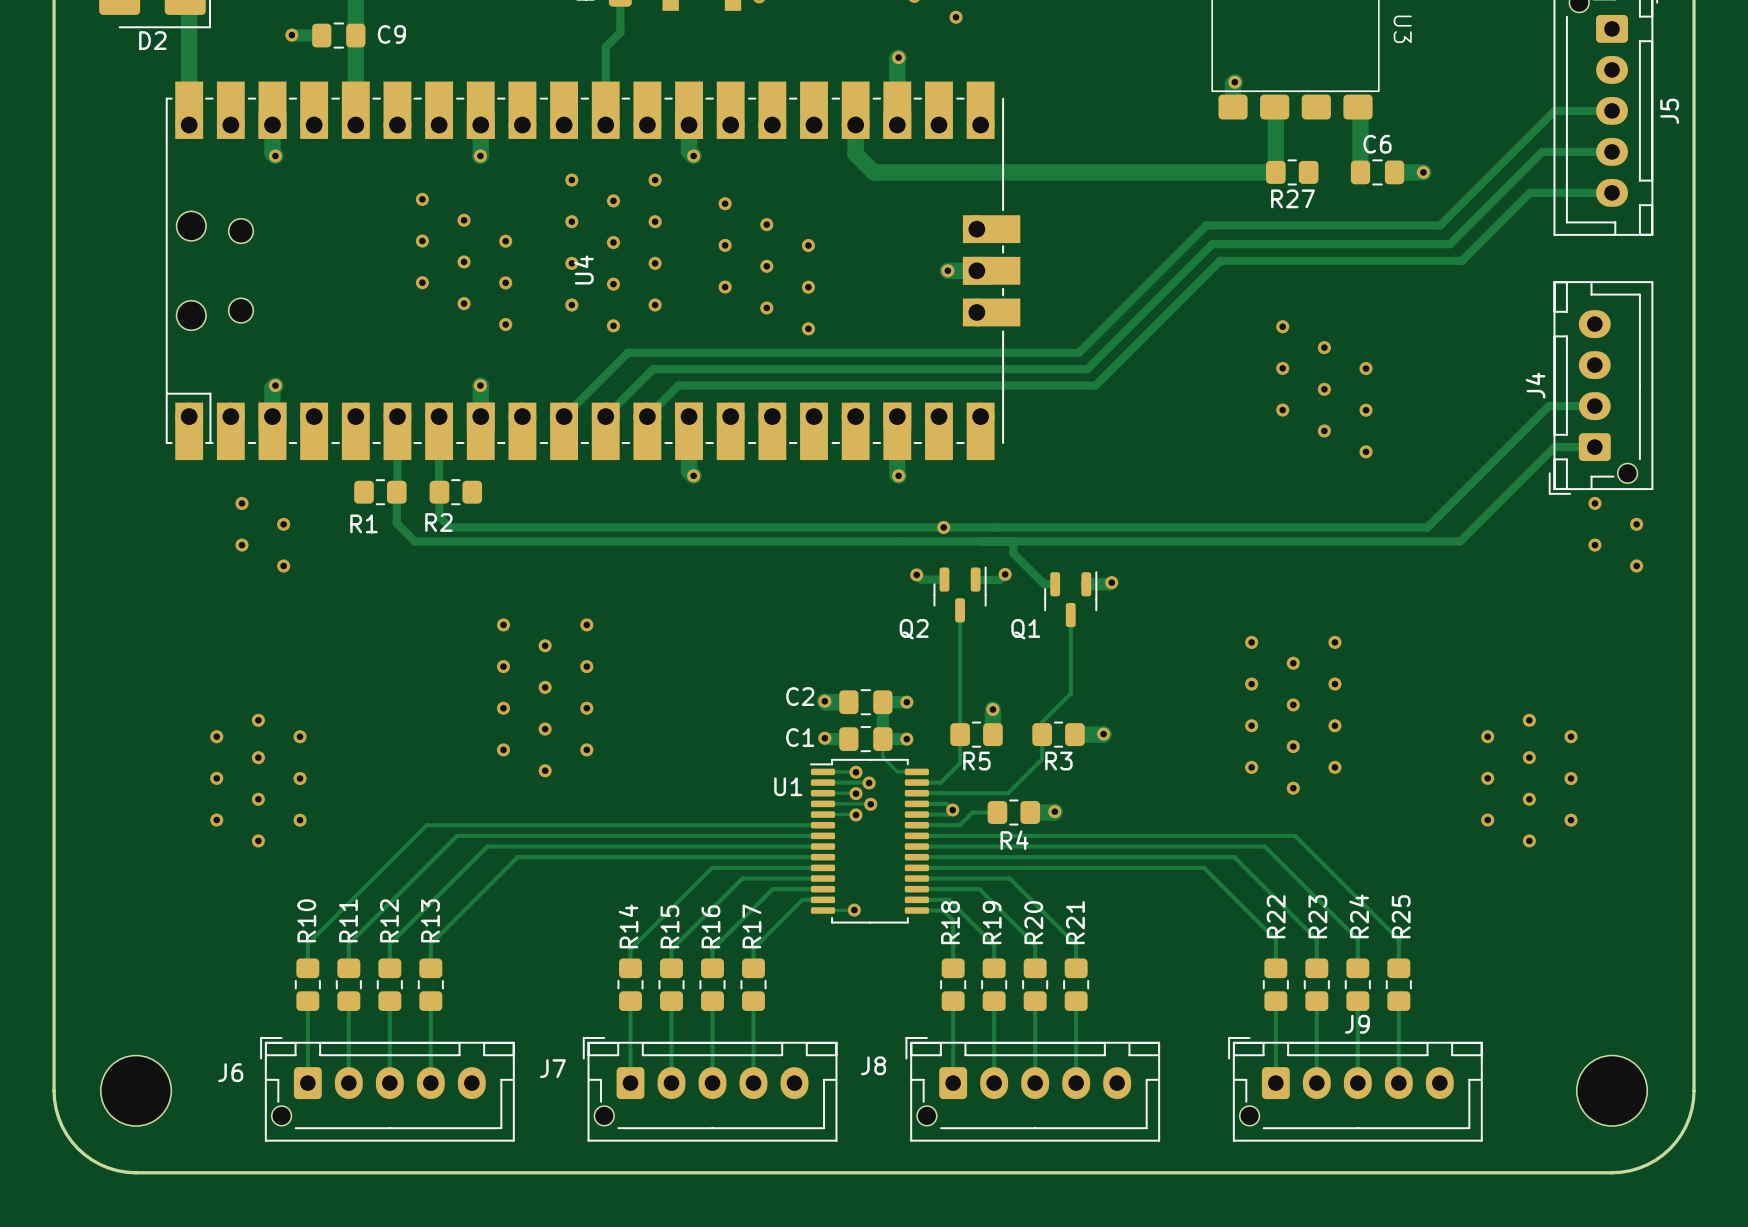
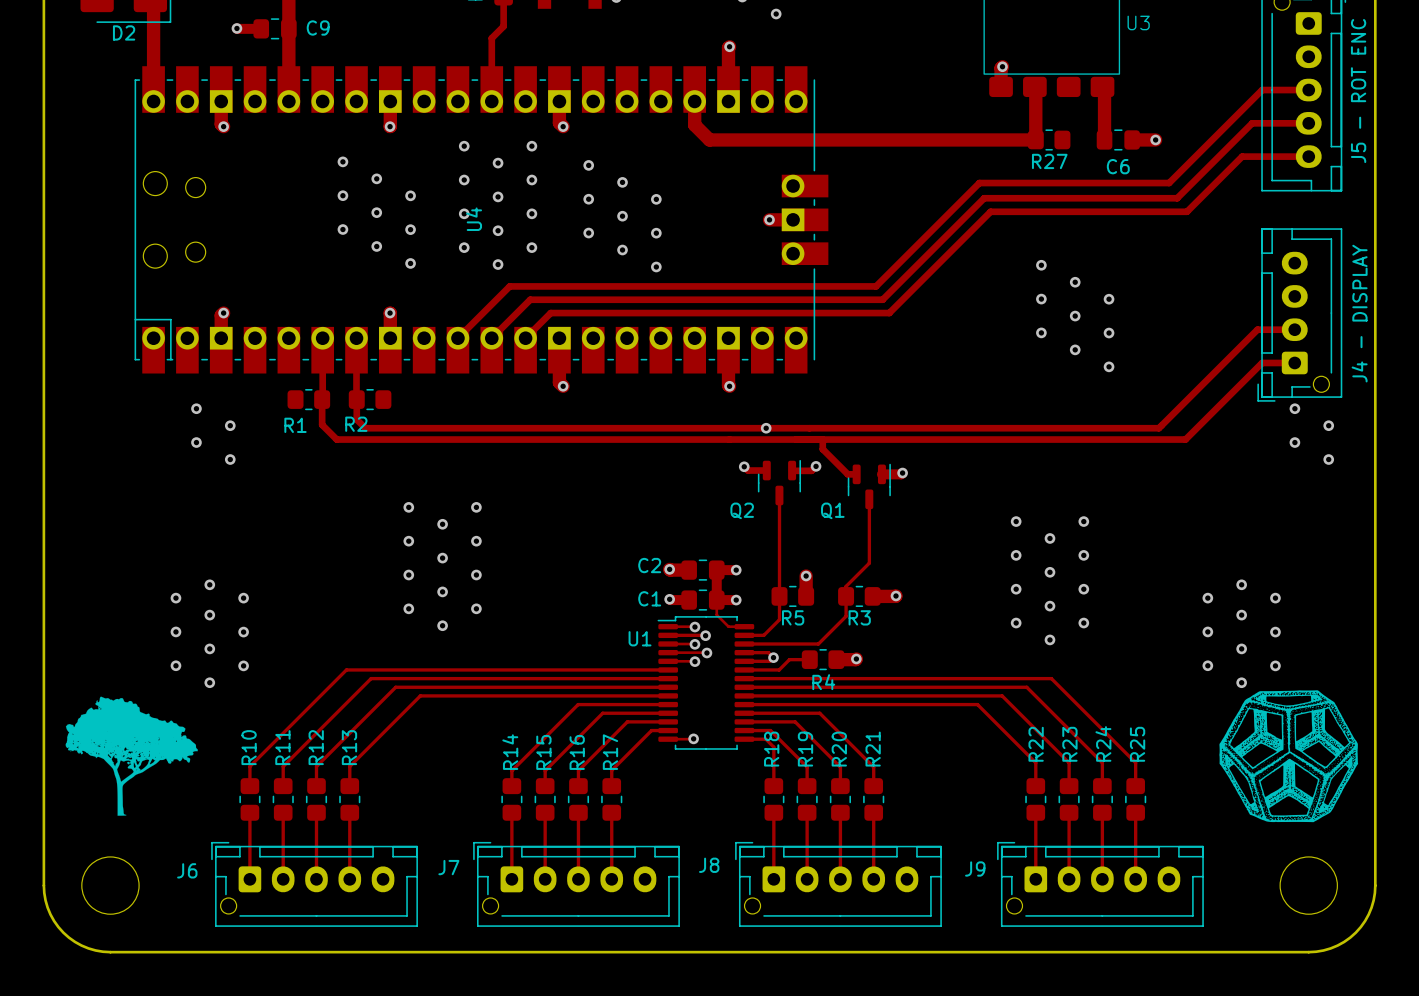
U3 name rotation: 0° (1402, 29) -> 90° counterclockwise (1138, 22)
J5 name: J5 (1669, 111) -> J5 - ROT ENC (1358, 91)
C6 name position: C6 (1377, 144) -> C6 (1118, 166)
J4 name: J4 (1535, 385) -> J4 - DISPLAY (1359, 313)
drawing: none -> [1219, 690, 1359, 823]
drawing: none -> [65, 696, 198, 816]
J9 name position: J9 (1357, 1024) -> J9 (975, 868)

